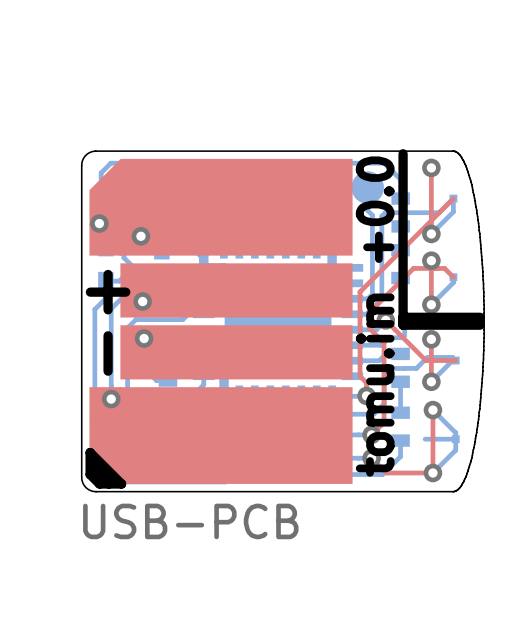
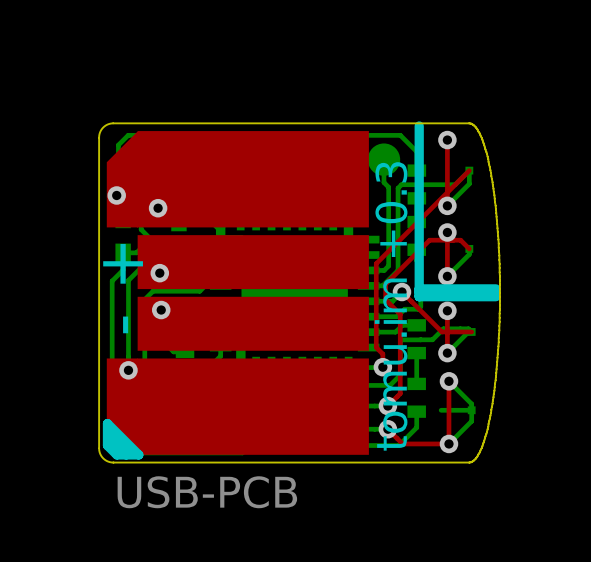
text: tomu.im +0.0 (375, 316) -> tomu.im +0.3 (391, 306)

